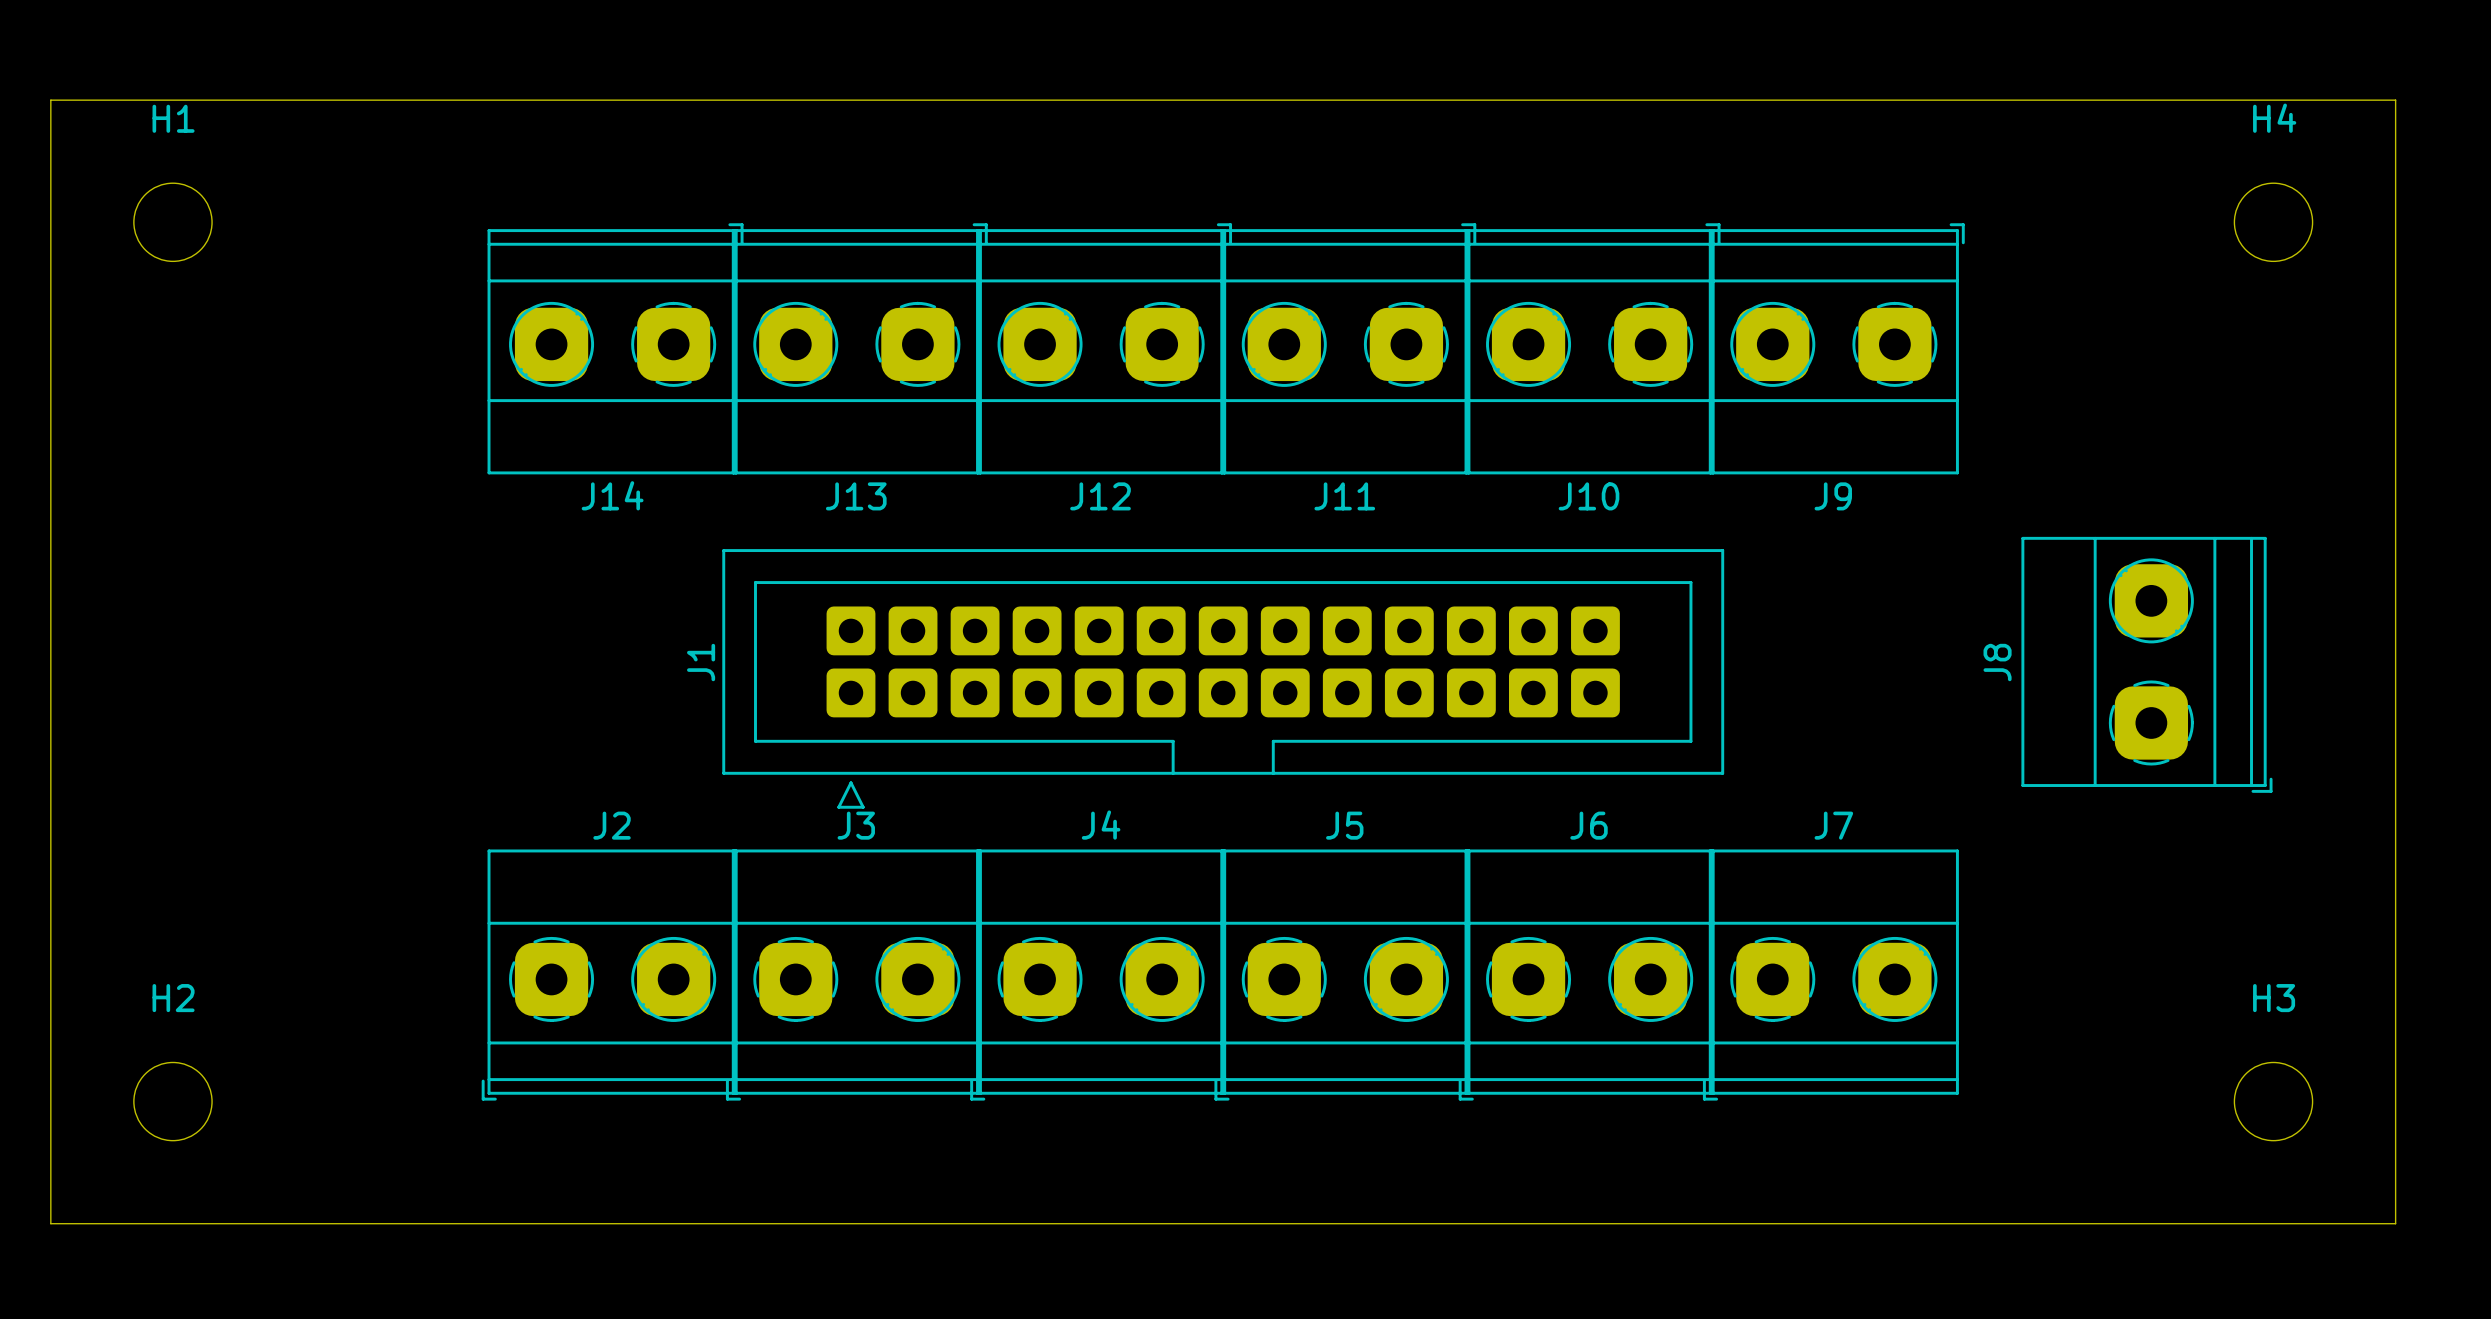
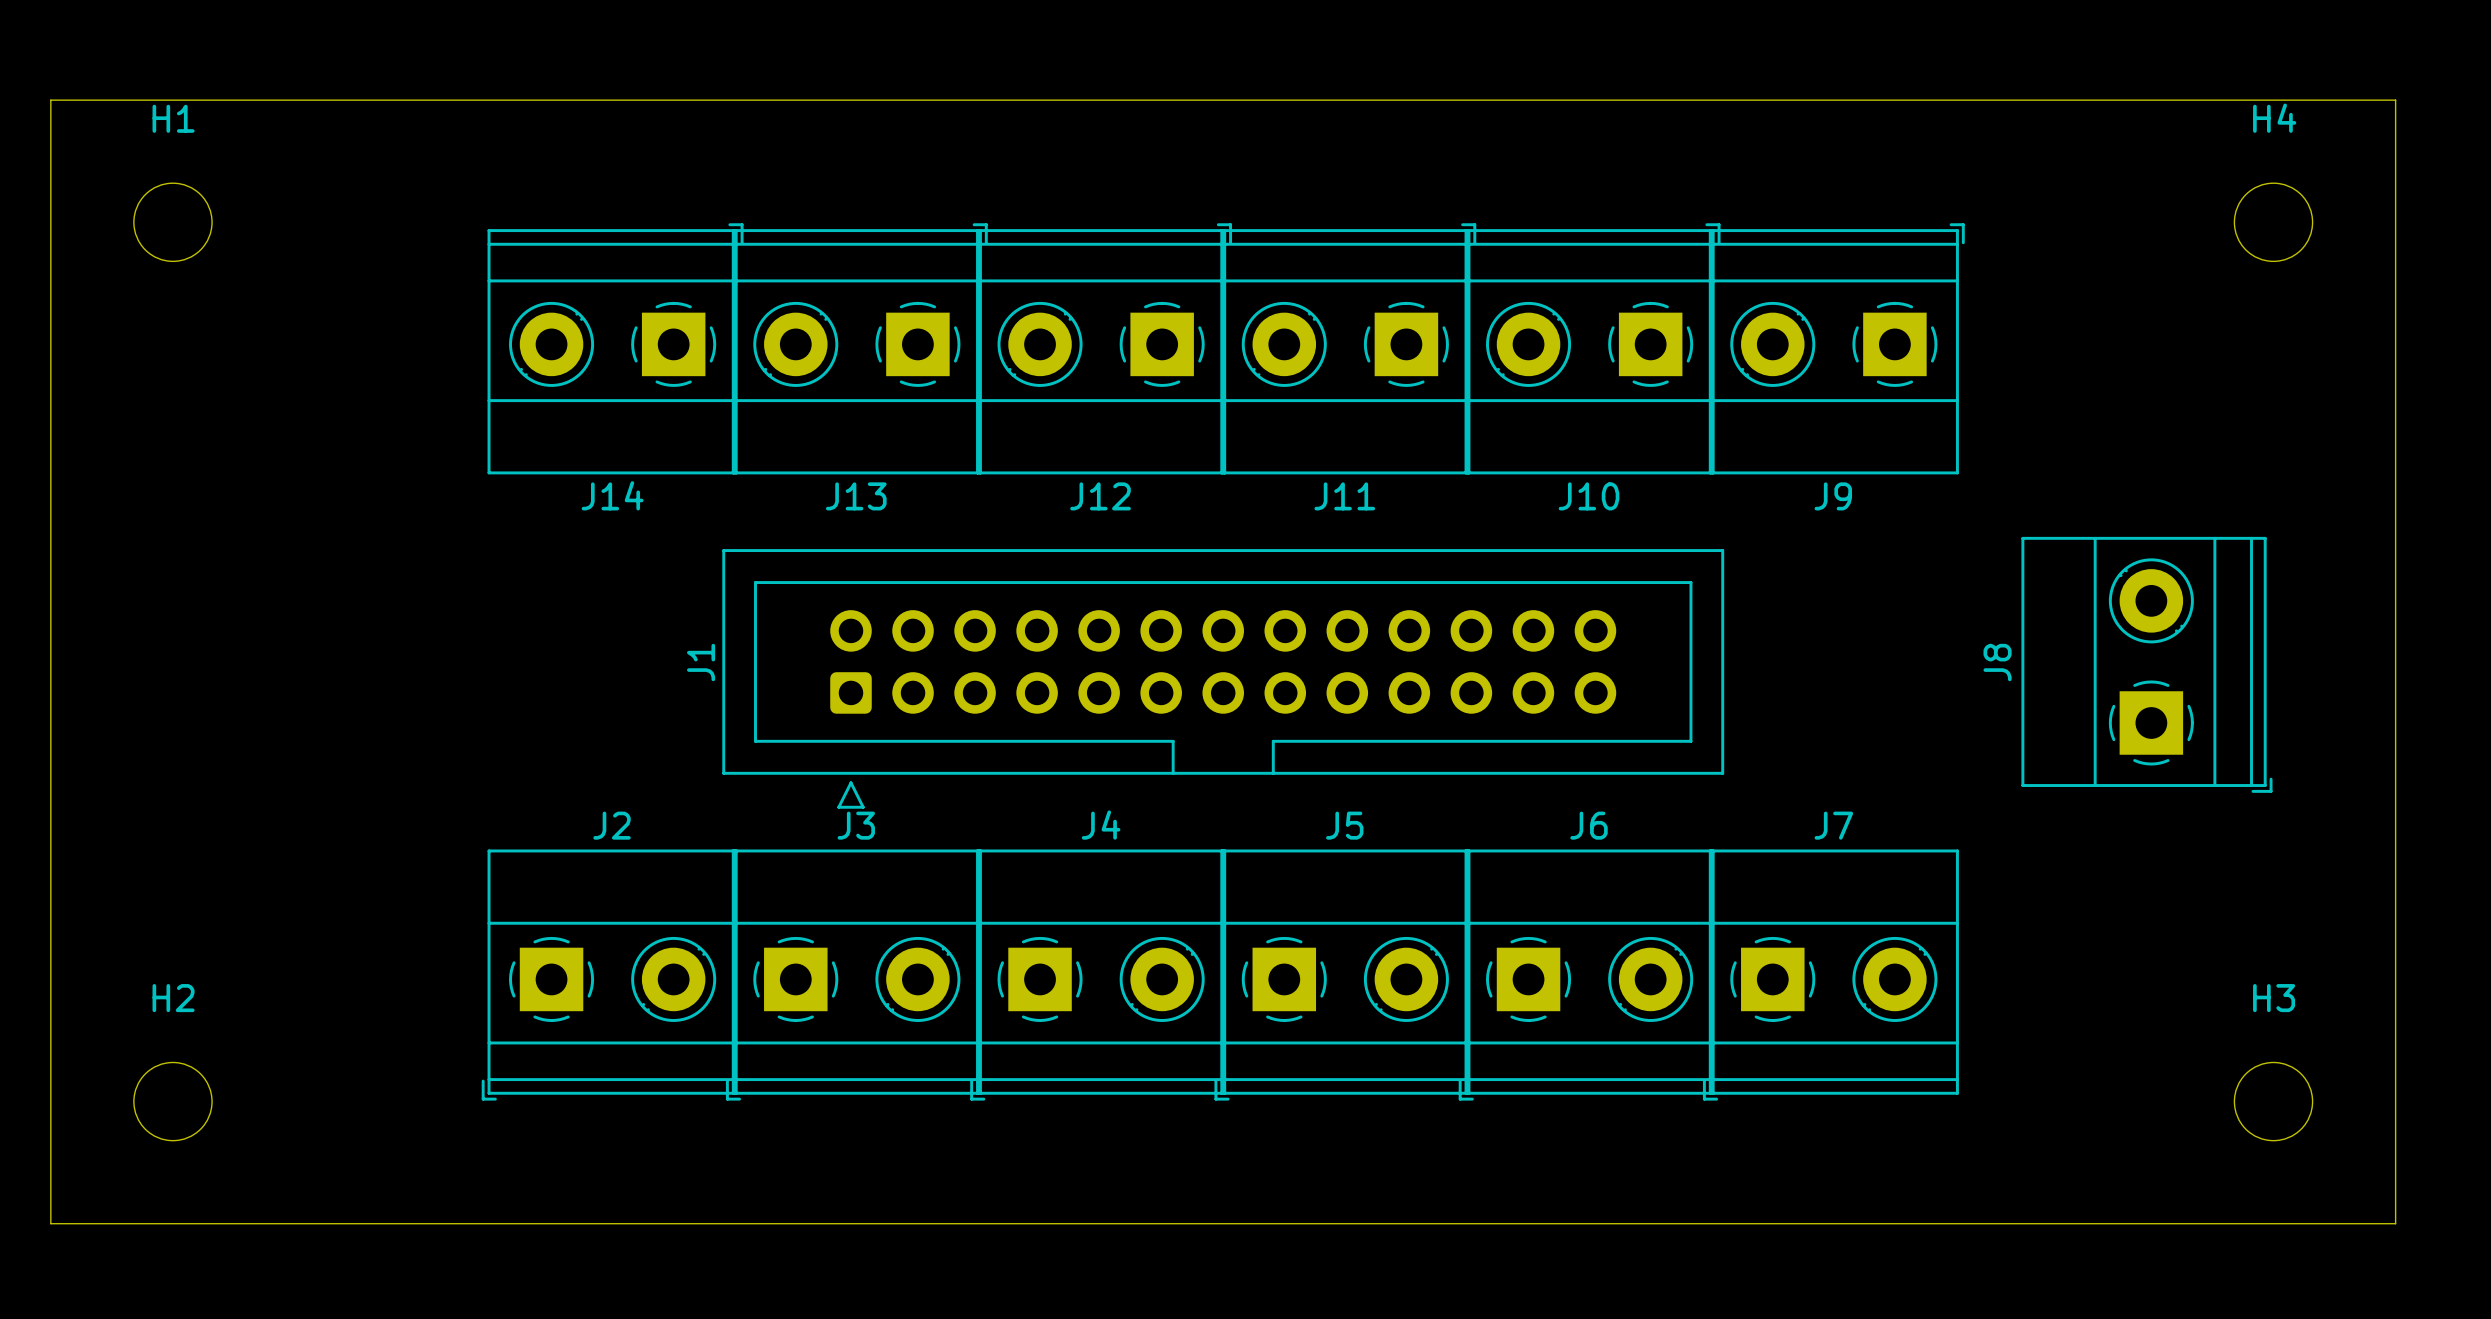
J14 footprint: [487, 223, 744, 475] -> [487, 223, 744, 475]
J13 footprint: [731, 223, 988, 475] -> [731, 223, 988, 475]
J12 footprint: [976, 223, 1233, 475] -> [976, 223, 1233, 475]
J11 footprint: [1220, 223, 1477, 475] -> [1220, 223, 1477, 475]
J10 footprint: [1464, 223, 1721, 475] -> [1464, 223, 1721, 475]
J9 footprint: [1708, 223, 1965, 475] -> [1708, 223, 1965, 475]
J8 footprint: [2021, 536, 2273, 793] -> [2021, 536, 2273, 793]
J1 footprint: [722, 549, 1725, 809] -> [722, 549, 1725, 809]
J2 footprint: [481, 849, 738, 1101] -> [481, 849, 738, 1101]
J3 footprint: [725, 849, 982, 1101] -> [725, 849, 982, 1101]
J4 footprint: [970, 849, 1227, 1101] -> [970, 849, 1227, 1101]
J5 footprint: [1214, 849, 1471, 1101] -> [1214, 849, 1471, 1101]
J6 footprint: [1458, 849, 1715, 1101] -> [1458, 849, 1715, 1101]
J7 footprint: [1702, 849, 1959, 1101] -> [1702, 849, 1959, 1101]

